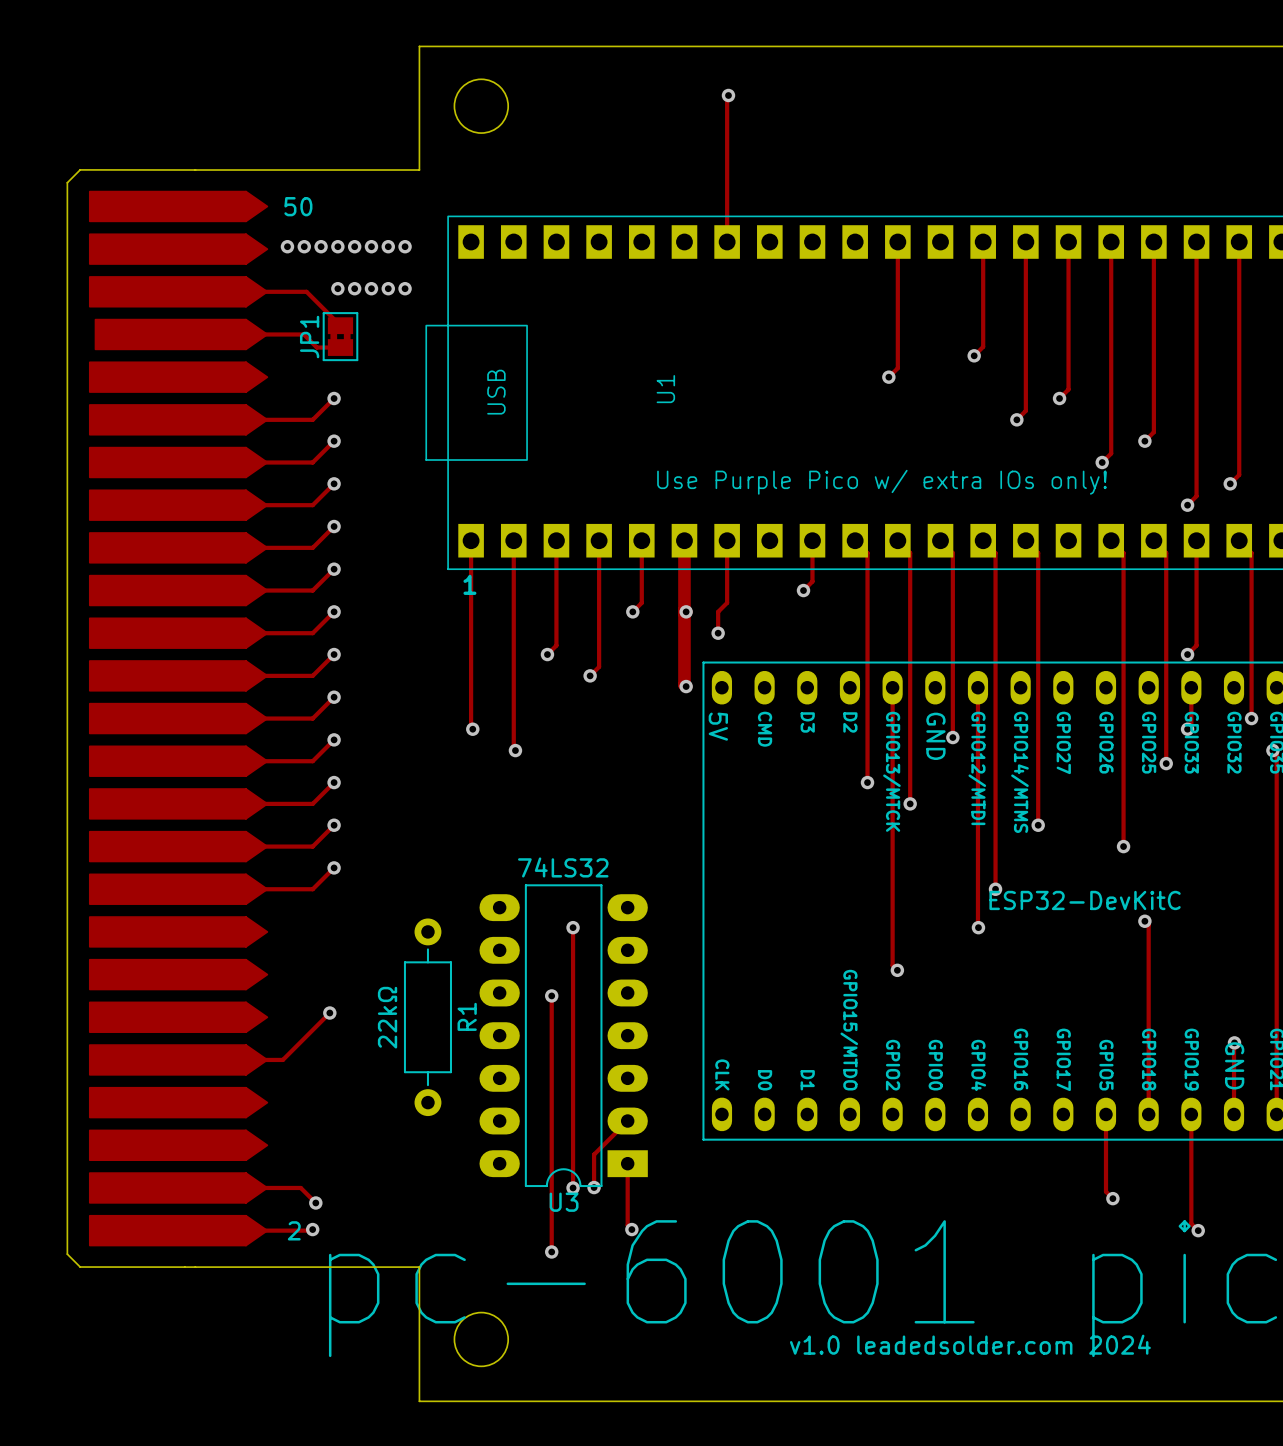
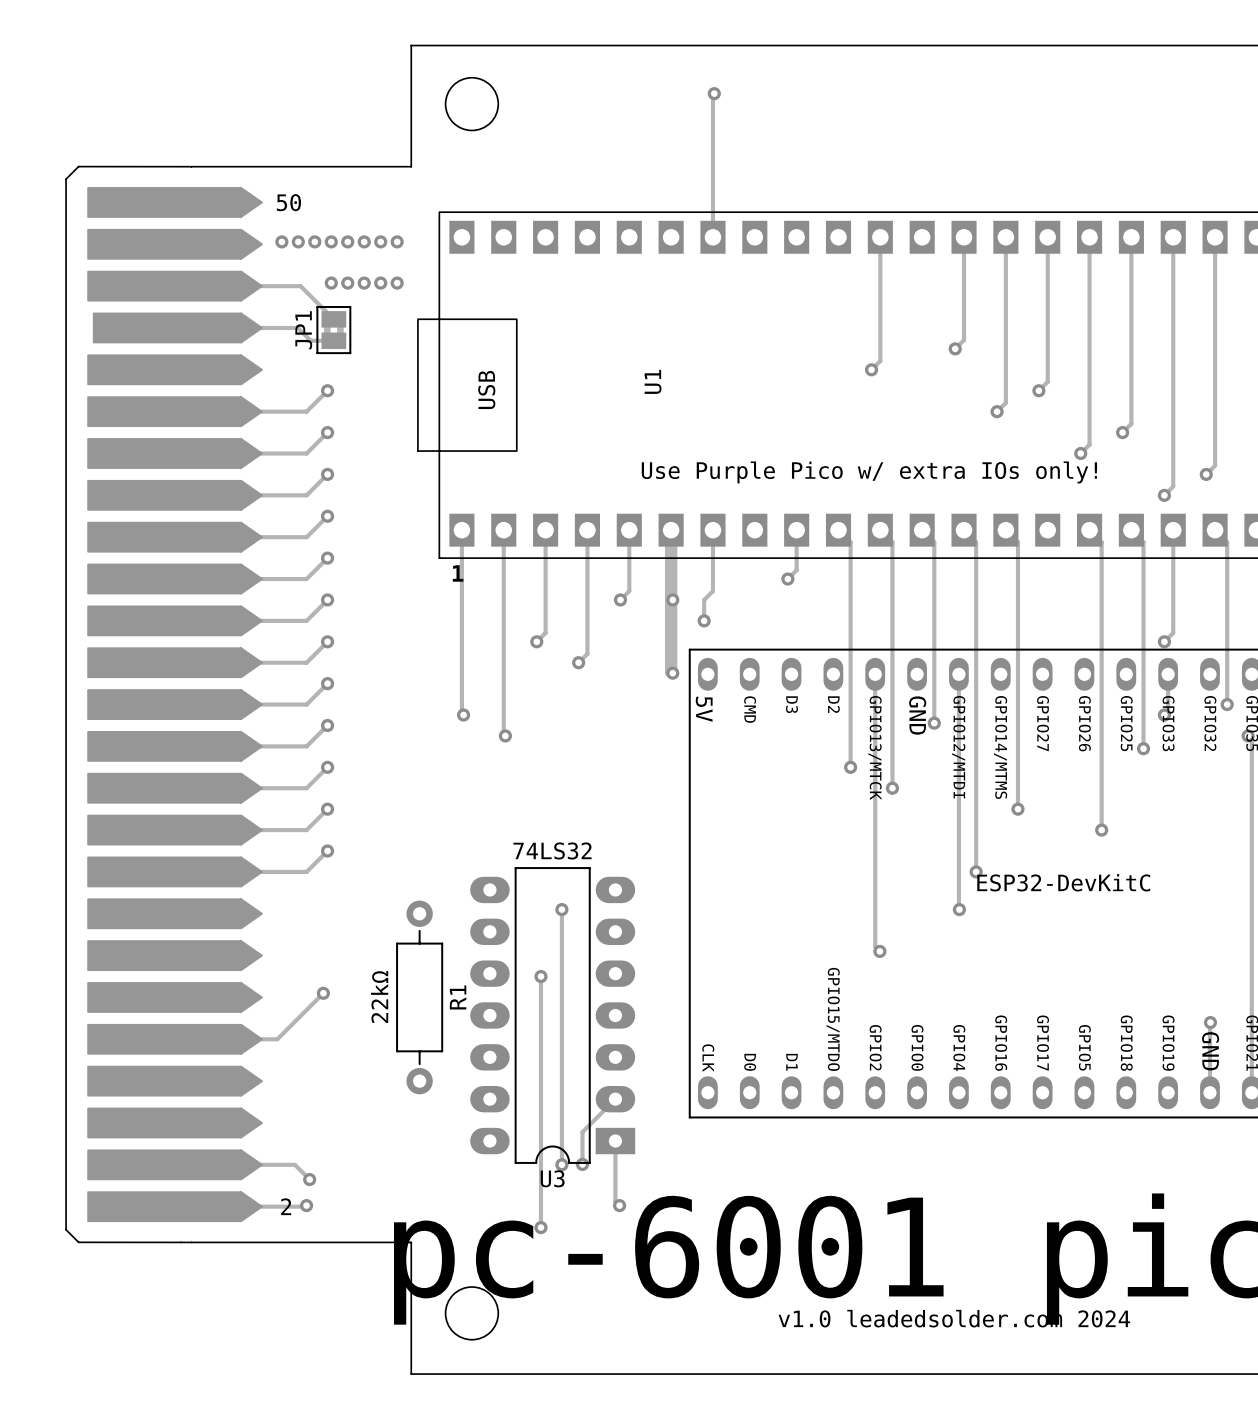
track: (1144, 921) (1148, 925) (1148, 1114) -> none
via: (1144, 921) -> none
track: (1106, 1114) (1106, 1191) (1112, 1198) -> none
track: (1191, 1114) (1191, 1223) (1198, 1230) -> none
via: (1112, 1198) -> none
via: (1198, 1230) -> none

